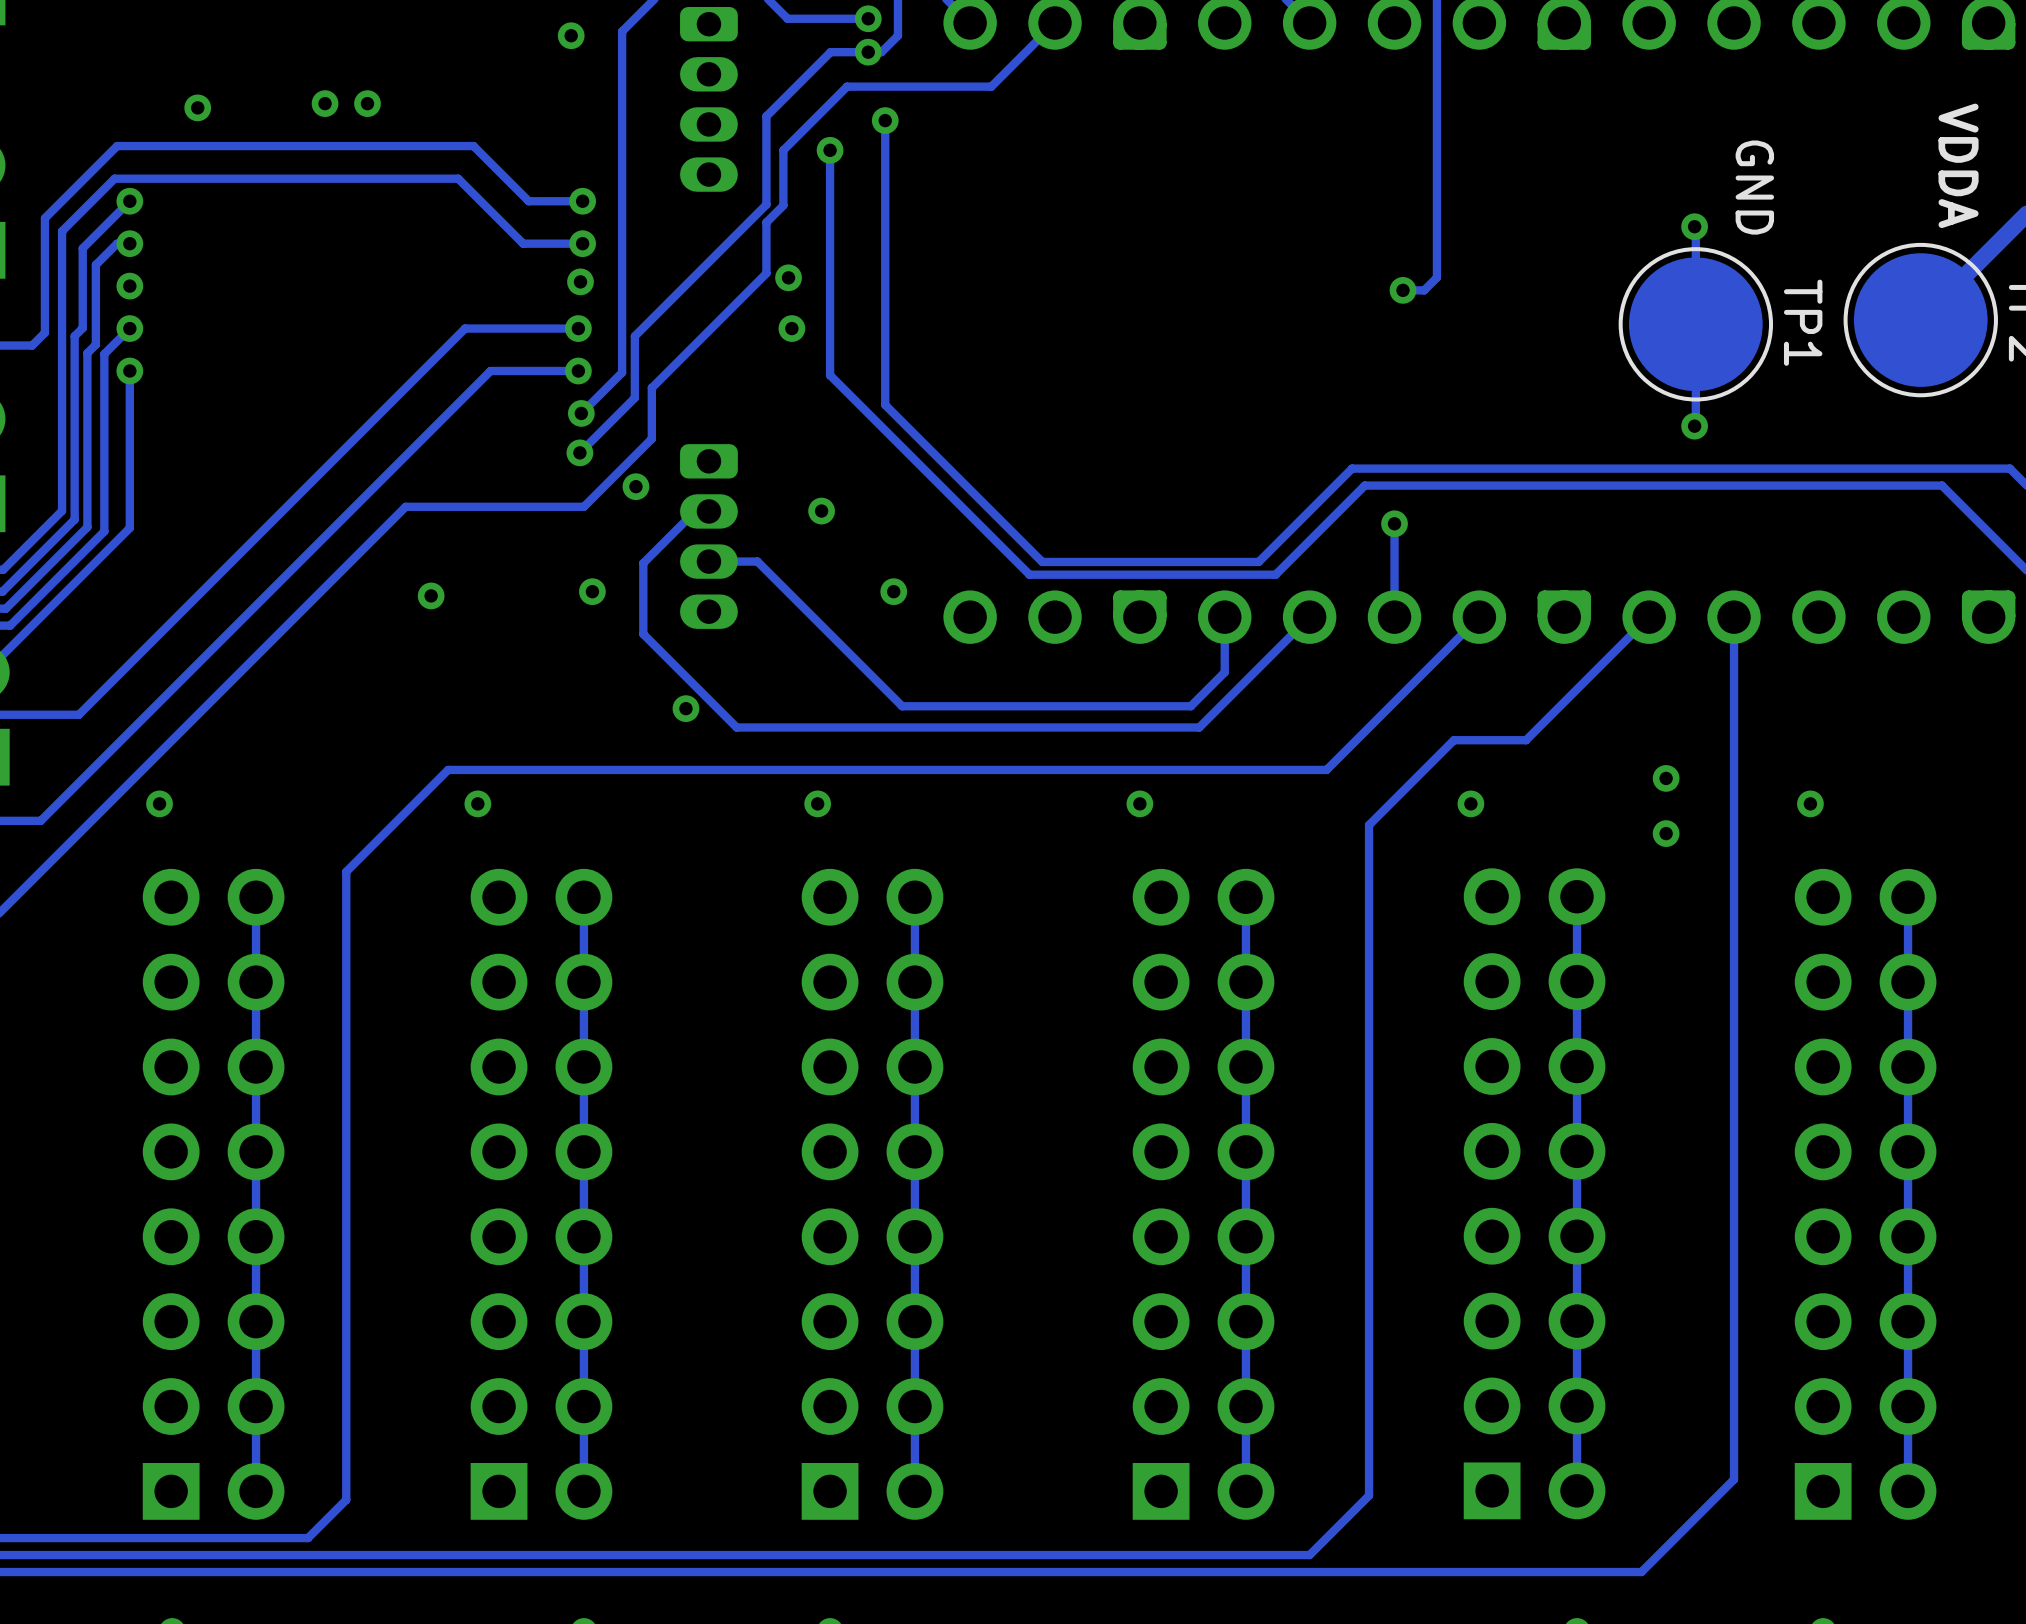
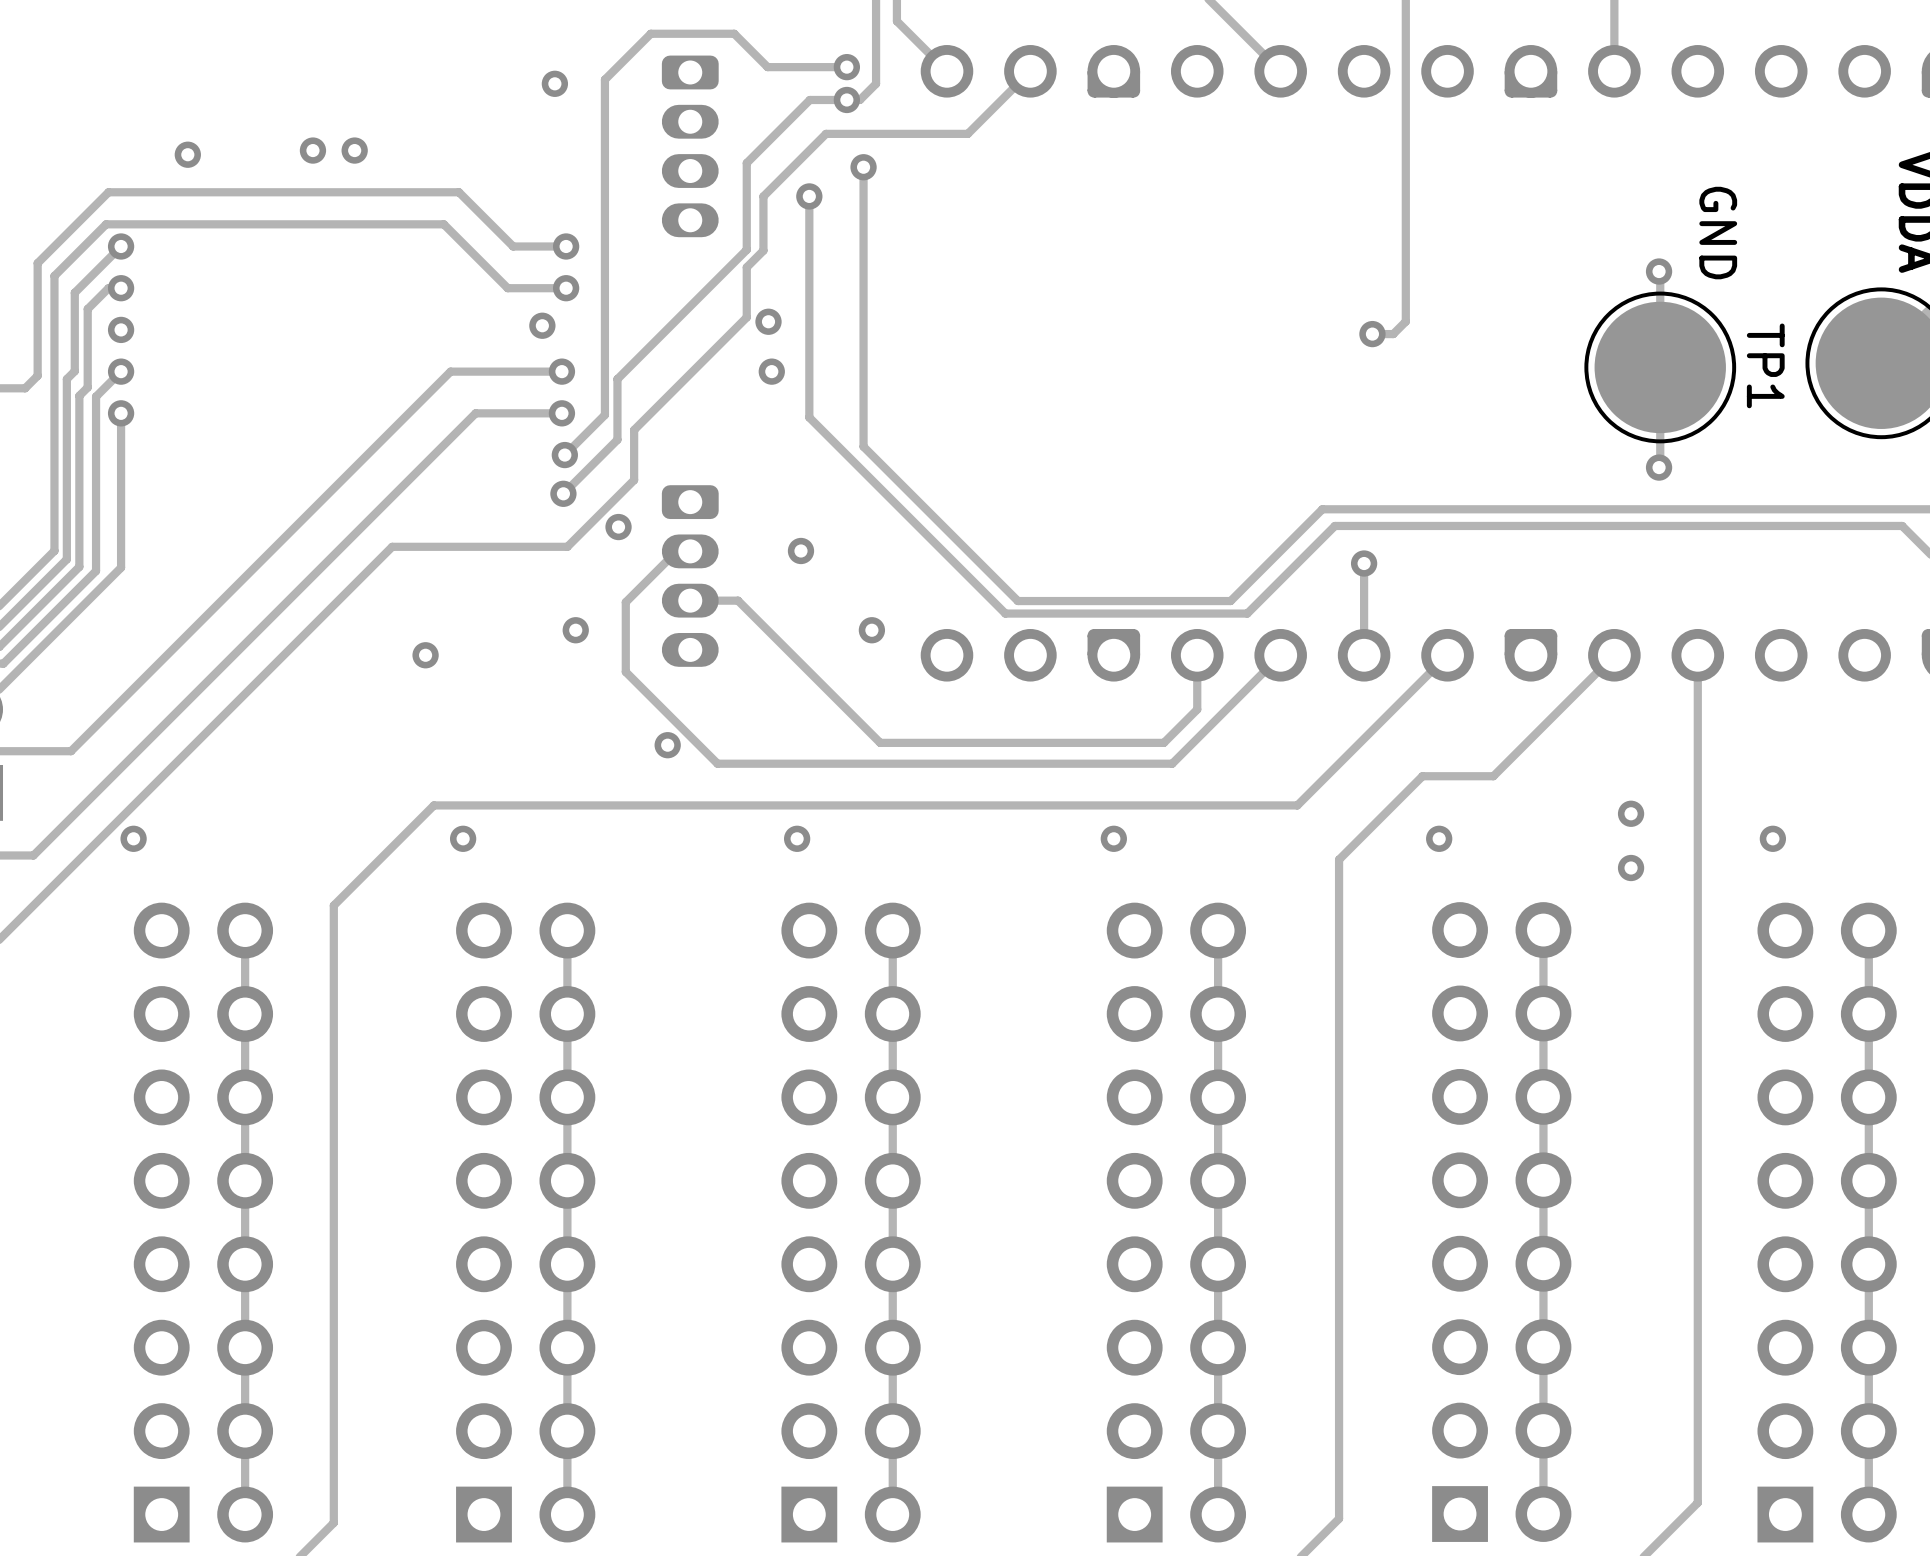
via position: (580, 281) -> (542, 325)
via position: (431, 595) -> (425, 655)
via position: (159, 803) -> (133, 838)

